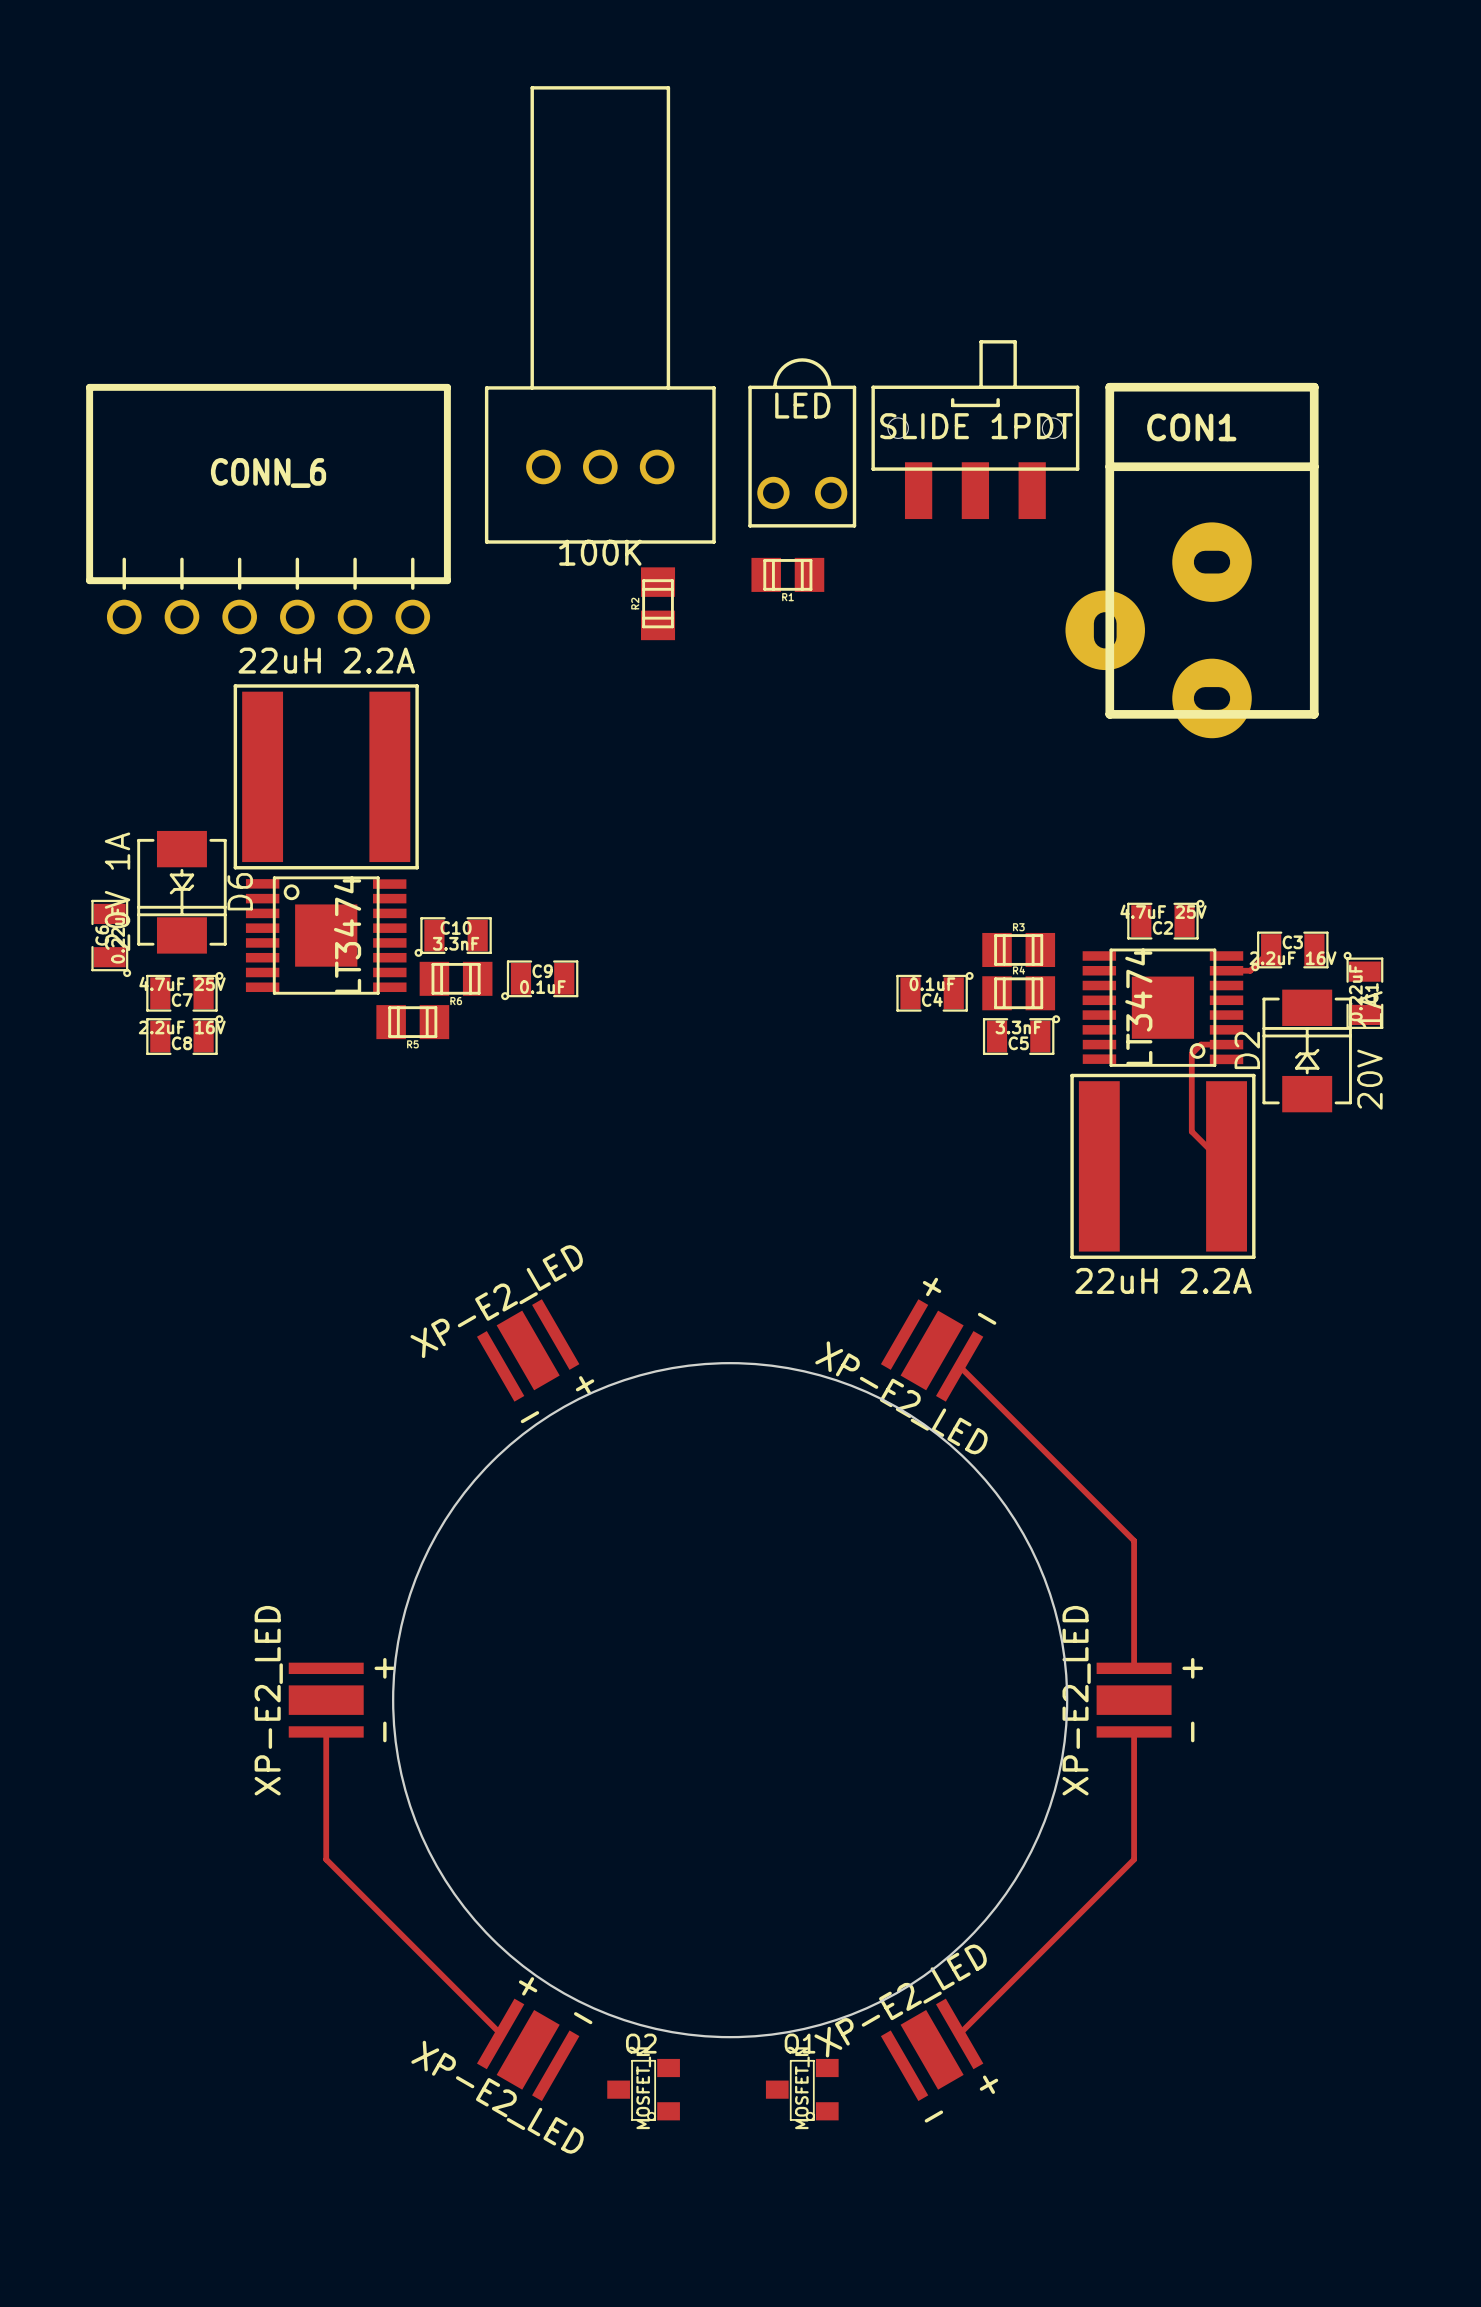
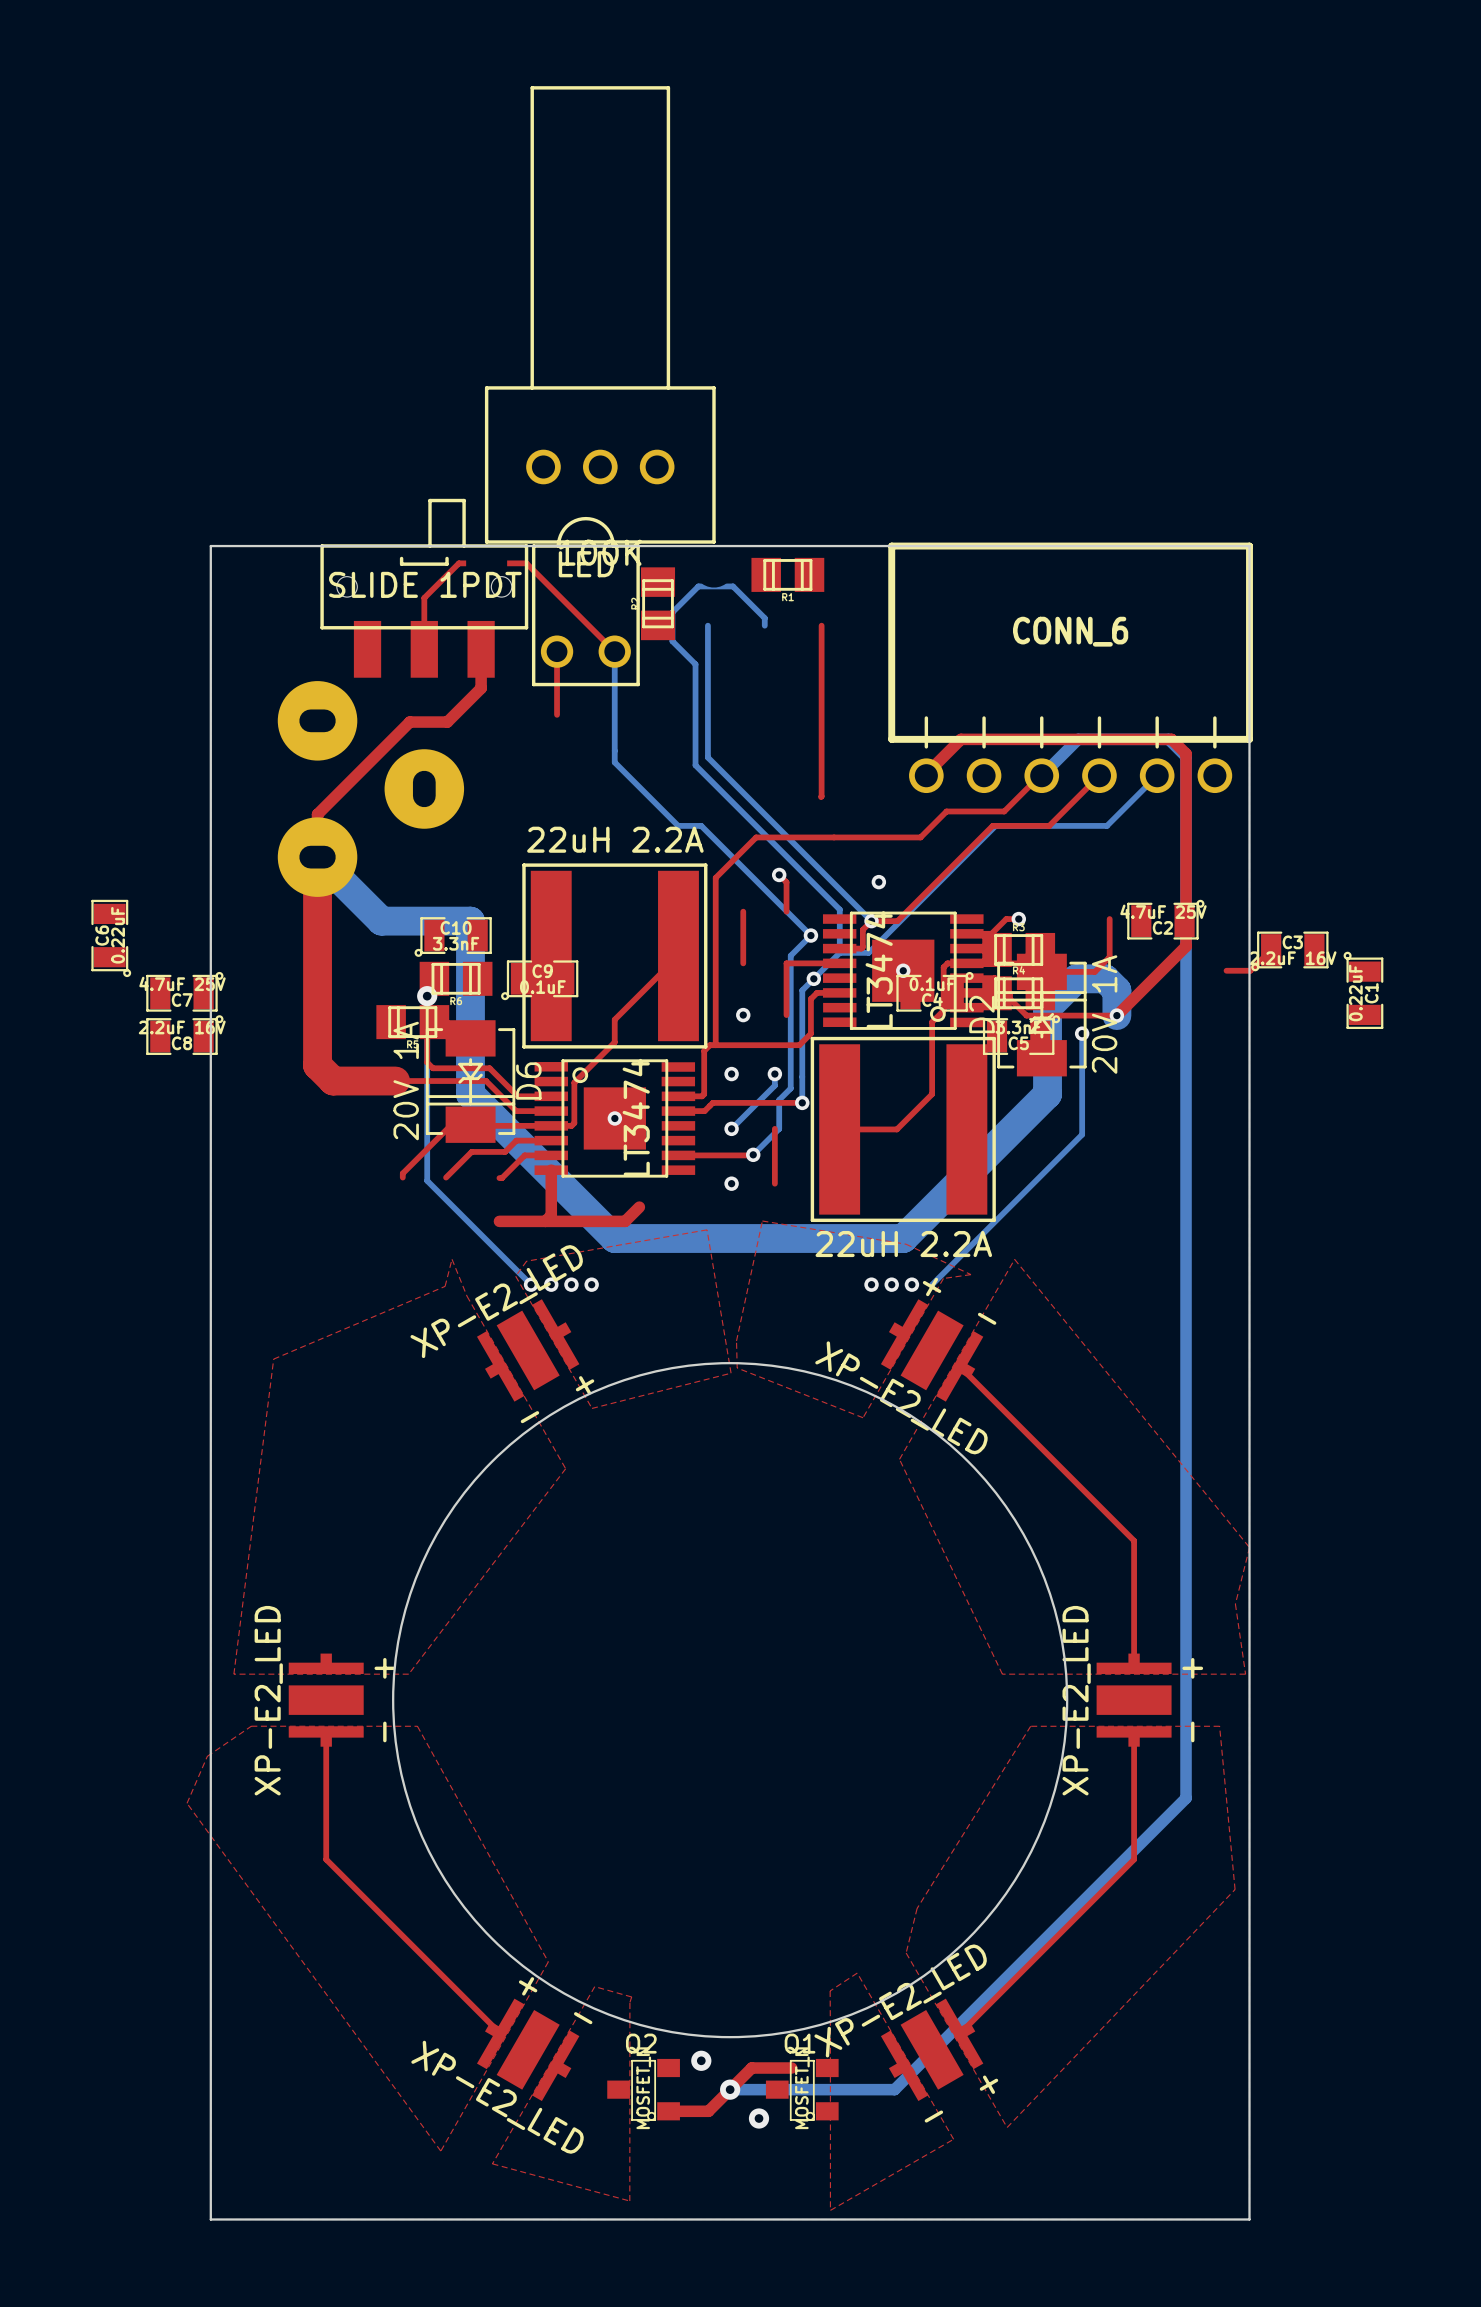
part: SLIDE 1PDT (975, 429) -> none
part position: (802, 442) -> (585, 601)
part: CONN_6 (268, 509) -> none
board edge: none -> (210, 546) (210, 2219) (1249, 2219) (1249, 546) (210, 546)
CON1: (1192, 560) -> none
part: none -> SLIDE 1PDT (424, 588)
bottom track: none -> (707, 625) (707, 757) (871, 921)
bottom track: none -> (764, 625) (764, 618) (733, 586) (698, 586) (672, 612) (672, 641) (695, 664) (695, 765) (839, 909) (839, 952)
top track: none -> (821, 625) (821, 797)
top track: none -> (424, 649) (424, 597) (458, 563) (526, 563) (614, 651)
top track: none -> (481, 649) (481, 688) (447, 722) (409, 722) (317, 814) (317, 1065) (333, 1081) (486, 1081) (516, 1111) (551, 1111)
top track: none -> (557, 651) (557, 714)
bottom track: none -> (614, 651) (614, 762) (678, 825) (701, 825) (810, 935) (790, 955) (790, 1088) (779, 1100) (779, 1128) (753, 1154)
part: none -> CONN_6 (1070, 667)
top track: none -> (926, 775) (960, 739) (1171, 739) (1186, 753) (1186, 946) (1116, 1015) (1026, 1015) (1010, 999) (1010, 993) (994, 978) (966, 978)
top track: none -> (1041, 775) (1004, 811) (946, 811) (920, 837) (756, 837) (715, 877) (715, 1045)
bottom track: none -> (1041, 775) (1078, 739) (1168, 739) (1186, 756) (1186, 1798) (894, 2089) (730, 2089)
top track: none -> (1099, 775) (1049, 825) (992, 825) (897, 921) (871, 921) (862, 929) (861, 948) (839, 948)
bottom track: none -> (1157, 775) (1106, 825) (995, 825) (868, 952) (839, 952)
part: 22uH 2.2A (326, 776) -> none
part: none -> (370, 788)
bottom track: none -> (317, 857) (381, 921) (470, 921) (470, 1094) (614, 1238) (903, 1238) (1047, 1094) (1047, 1007) (1076, 978) (1105, 978) (1116, 990) (1117, 1016)
top track: none -> (779, 874) (786, 882) (786, 911)
via: none -> (779, 874)
via: none -> (878, 882)
D6 position: (181, 892) -> (470, 1081)
top track: none -> (743, 911) (743, 963)
top track: none -> (1018, 919) (1006, 919) (991, 933) (966, 933)
via: none -> (1018, 919)
top track: none -> (1109, 919) (1109, 957) (1094, 971) (1041, 971) (1033, 963) (947, 963) (943, 967) (943, 1010) (932, 1022) (932, 1094) (896, 1129) (839, 1129)
via: none -> (871, 921)
part: LT3474 (326, 935) -> none
via: none -> (810, 935)
bottom track: none -> (839, 952) (802, 990) (802, 1102)
part: none -> 22uH 2.2A (614, 955)
top track: none -> (678, 955) (614, 1019) (614, 1042) (574, 1082) (574, 1123) (571, 1125) (451, 1124) (402, 1173) (402, 1177)
top track: none -> (839, 963) (786, 963) (786, 1015)
via: none -> (903, 970)
via: none -> (813, 978)
top track: none -> (839, 992) (817, 992) (810, 999) (810, 1033) (799, 1045) (709, 1045) (704, 1050) (704, 1094) (702, 1096) (678, 1096)
top track: none -> (427, 996) (427, 1062) (432, 1068) (489, 1068) (517, 1096) (551, 1096)
bottom track: none -> (427, 996) (427, 1180) (531, 1284)
via: none -> (427, 996)
part position: (1162, 1007) -> (903, 970)
via: none -> (743, 1015)
via: none -> (1116, 1015)
bottom track: none -> (1082, 1033) (1082, 1134) (932, 1284)
via: none -> (1082, 1033)
top track: (1226, 1044) (1201, 1044) (1191, 1053) (1191, 1131) (1226, 1166) -> none
D2 position: (1307, 1050) -> (1041, 1015)
via: none -> (731, 1074)
bottom track: none -> (774, 1074) (774, 1085) (731, 1128)
via: none -> (774, 1074)
top track: none -> (802, 1102) (712, 1102) (704, 1111) (678, 1111)
via: none -> (802, 1102)
part: none -> LT3474 (614, 1118)
via: none -> (614, 1118)
via: none -> (731, 1128)
top track: none -> (774, 1128) (774, 1183)
top track: none -> (551, 1140) (516, 1140) (505, 1151) (471, 1151) (446, 1177)
top track: none -> (753, 1154) (678, 1155)
via: none -> (753, 1154)
top track: none -> (551, 1155) (524, 1155) (502, 1178) (499, 1178)
part position: (1162, 1166) -> (903, 1129)
top track: none -> (551, 1170) (551, 1215) (545, 1221)
via: none -> (731, 1183)
top track: none -> (639, 1207) (625, 1221) (499, 1221)
top zone outline: none -> (762, 1221) (736, 1340) (737, 1368) (863, 1417) (943, 1278) (970, 1274) (905, 1244) (762, 1221)
top zone outline: none -> (707, 1229) (731, 1373) (592, 1408) (515, 1276) (526, 1261) (707, 1229)
top zone outline: none -> (452, 1259) (445, 1286) (273, 1359) (233, 1674) (408, 1674) (565, 1468) (467, 1296) (452, 1259)
top zone outline: none -> (1014, 1259) (899, 1459) (1002, 1674) (1245, 1674) (1235, 1604) (1249, 1547) (1014, 1259)
via: none -> (531, 1284)
via: none -> (551, 1284)
via: none -> (571, 1284)
via: none -> (591, 1284)
via: none -> (871, 1284)
via: none -> (891, 1284)
via: none -> (911, 1284)
part footprint: [476, 1299, 580, 1402] -> [476, 1299, 580, 1402]
part footprint: [880, 1299, 984, 1402] -> [880, 1299, 984, 1402]
part footprint: [288, 1662, 364, 1738] -> [288, 1653, 364, 1747]
part footprint: [1096, 1662, 1172, 1738] -> [1096, 1653, 1172, 1747]
top zone outline: none -> (251, 1726) (417, 1726) (548, 1961) (440, 2151) (187, 1803) (207, 1756) (251, 1726)
top zone outline: none -> (1030, 1726) (1219, 1726) (1235, 1889) (1007, 2127) (906, 1953) (917, 1908) (1030, 1726)
top zone outline: none -> (857, 1973) (953, 2139) (830, 2210) (830, 1990) (857, 1973)
top zone outline: none -> (594, 1986) (492, 2163) (629, 2201) (629, 2002) (631, 1996) (594, 1986)
part footprint: [476, 1998, 580, 2102] -> [476, 1998, 580, 2102]
part footprint: [880, 1998, 984, 2102] -> [880, 1998, 984, 2102]
via: none -> (701, 2060)
top track: none -> (791, 2068) (751, 2068) (708, 2111) (668, 2111)
via: none -> (730, 2089)
via: none -> (759, 2118)

